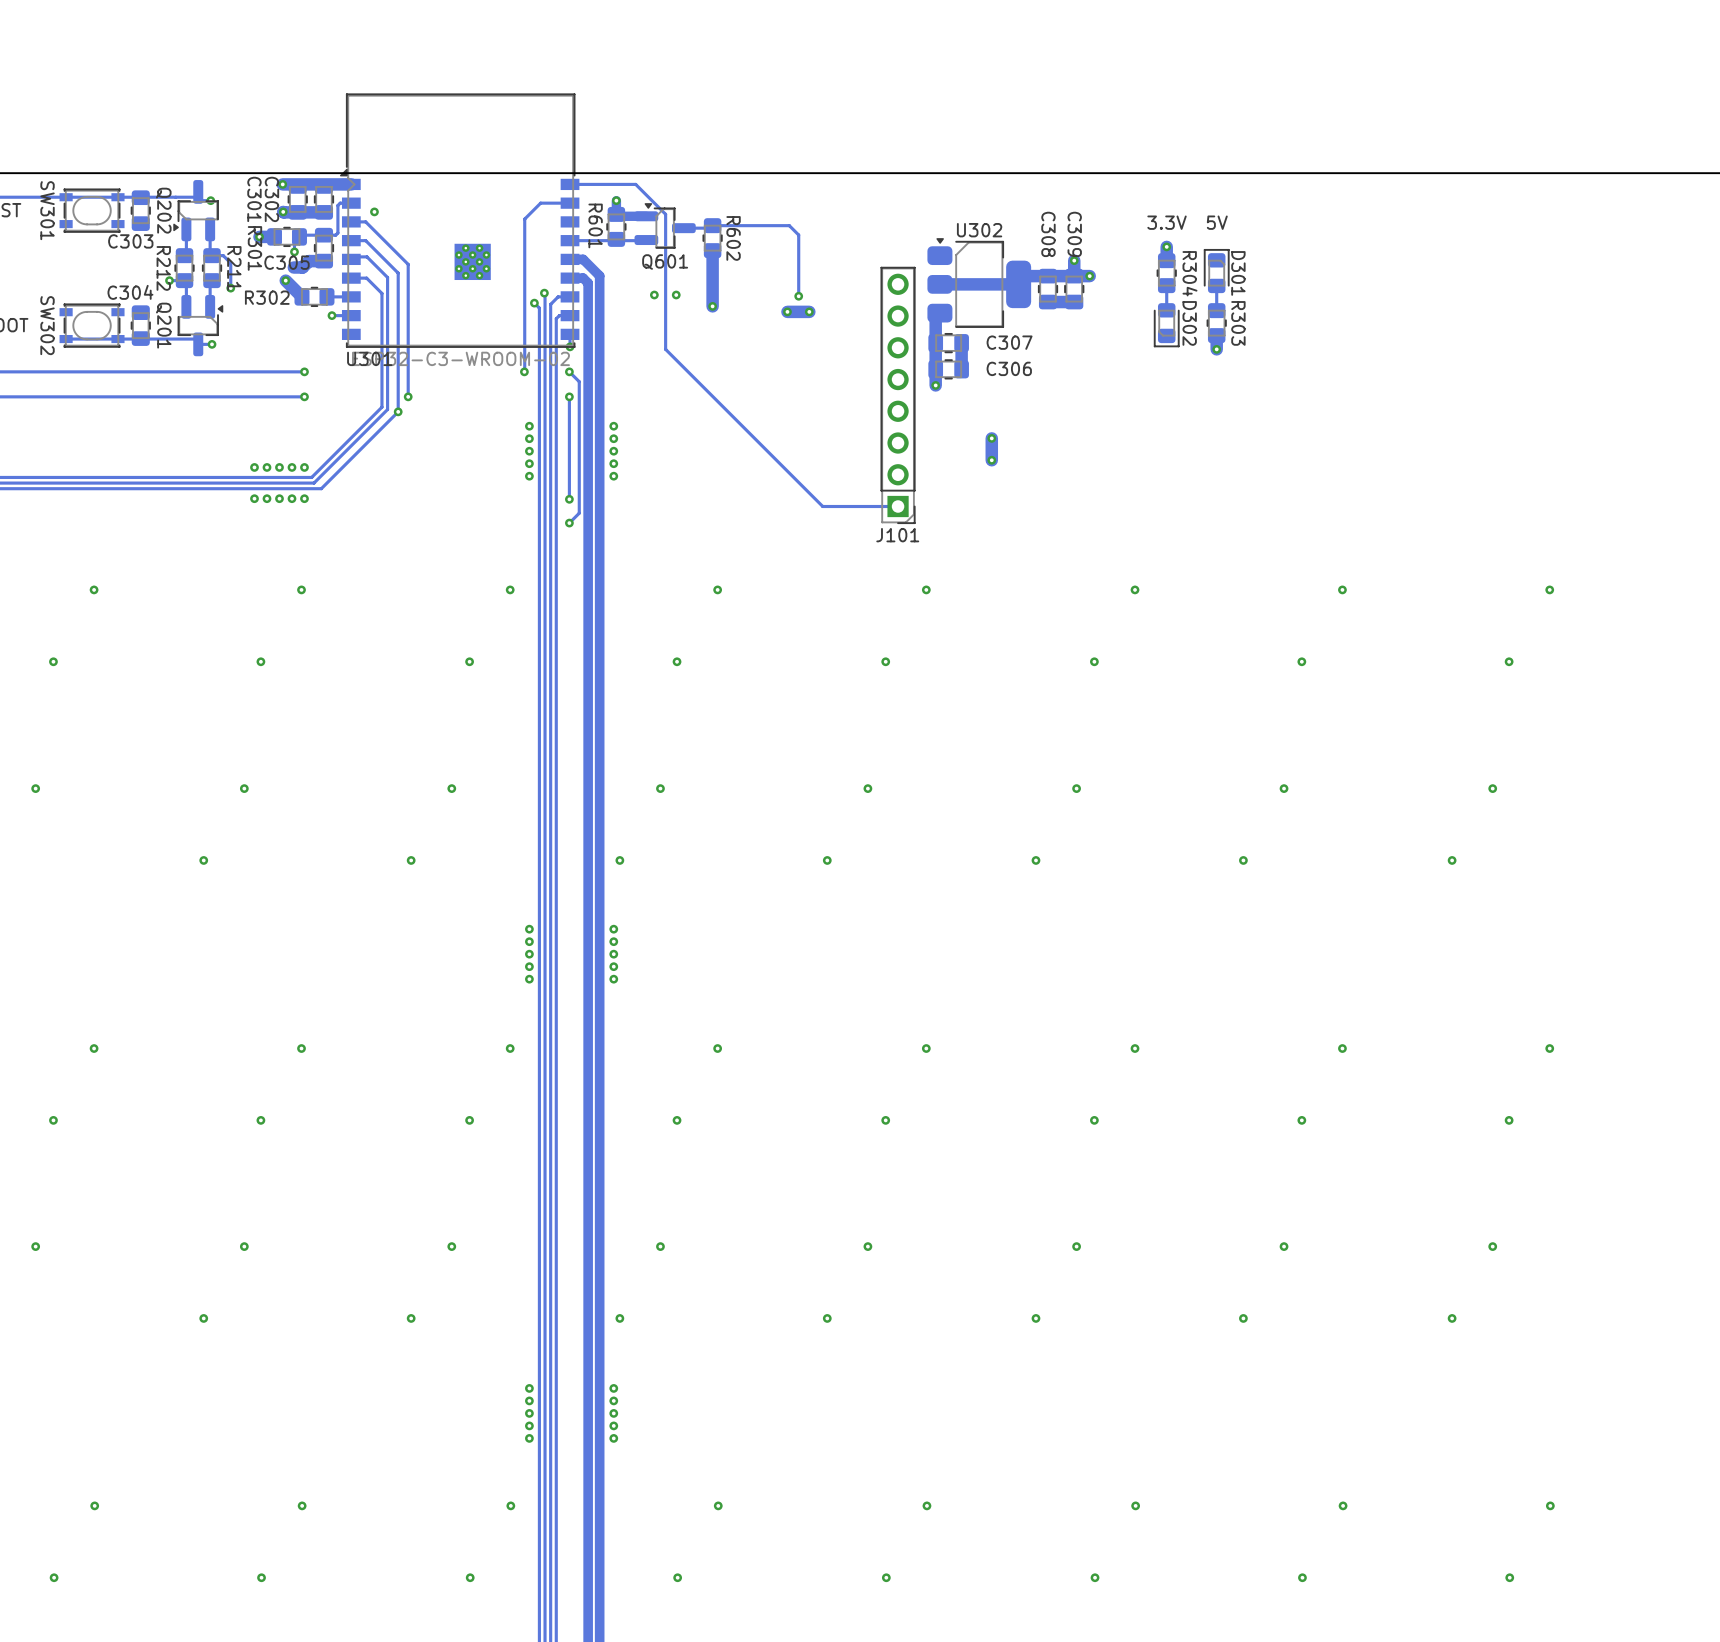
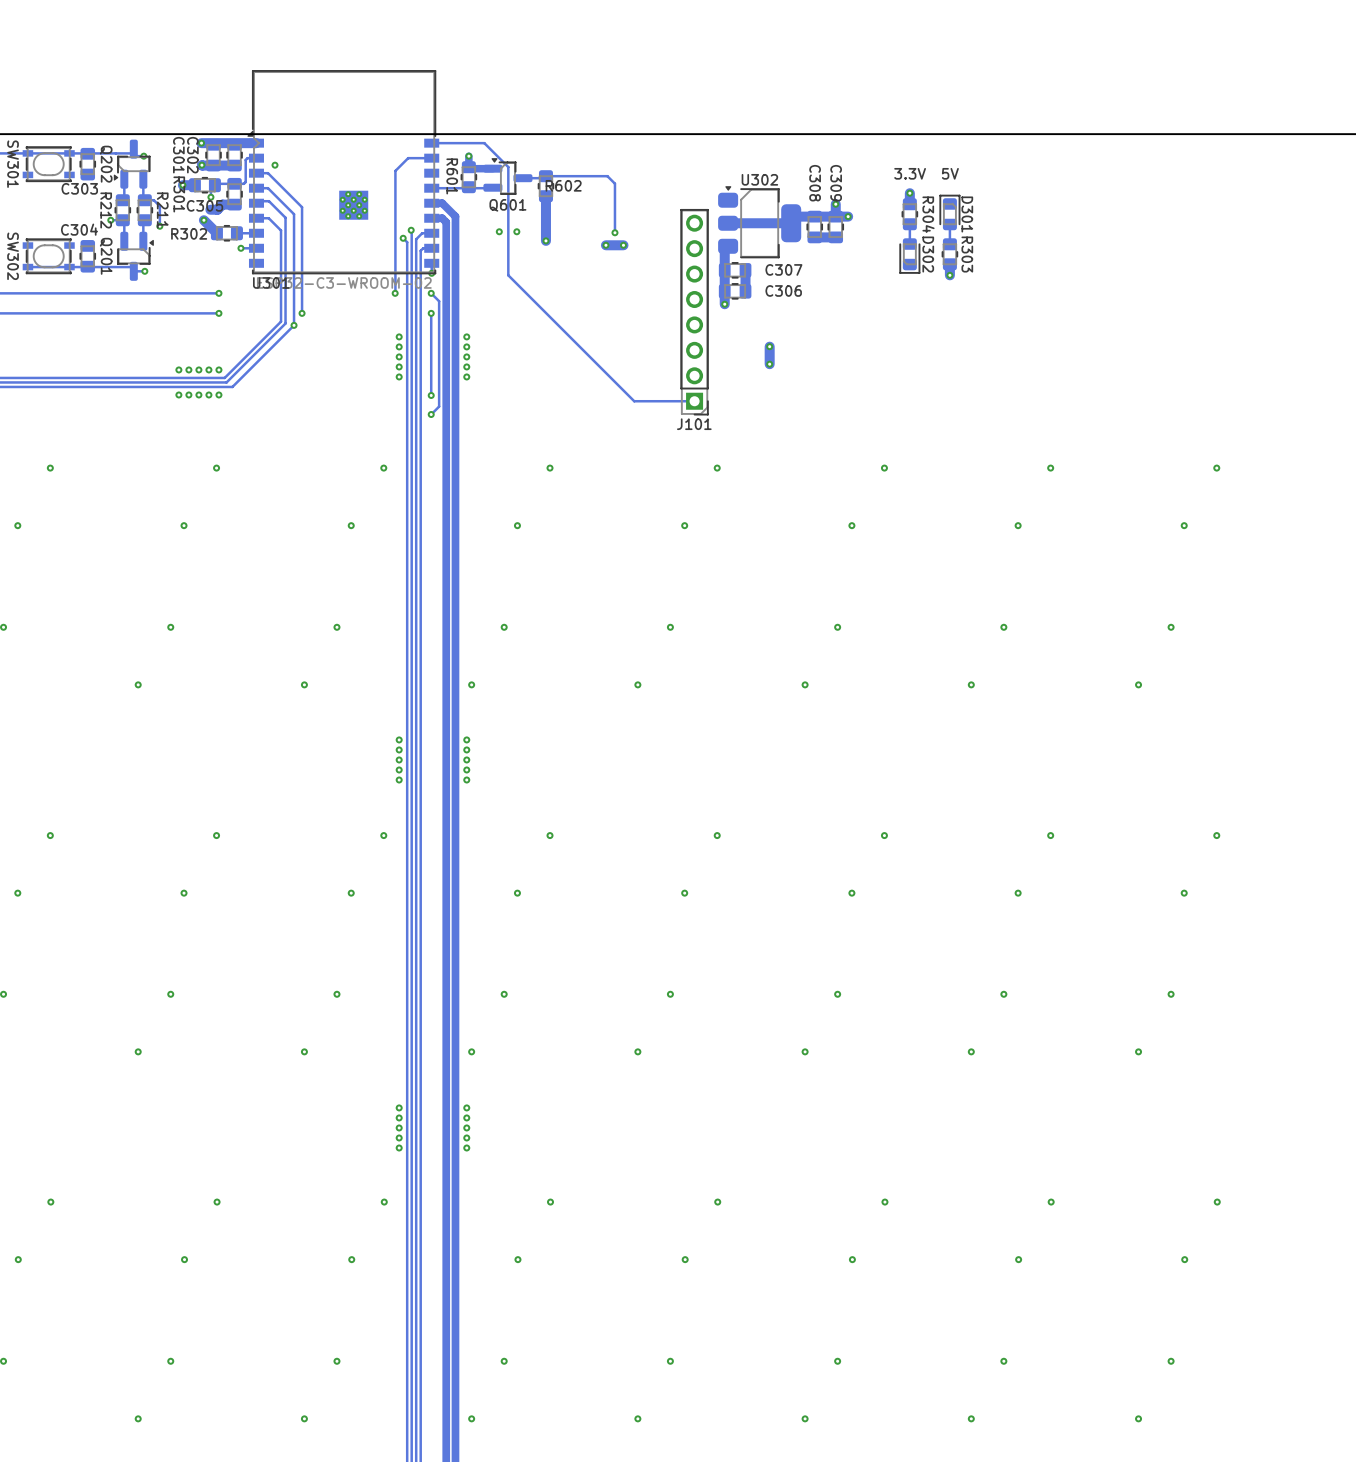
R602 name rotation: 0° (733, 238) -> 90° counterclockwise (563, 185)

